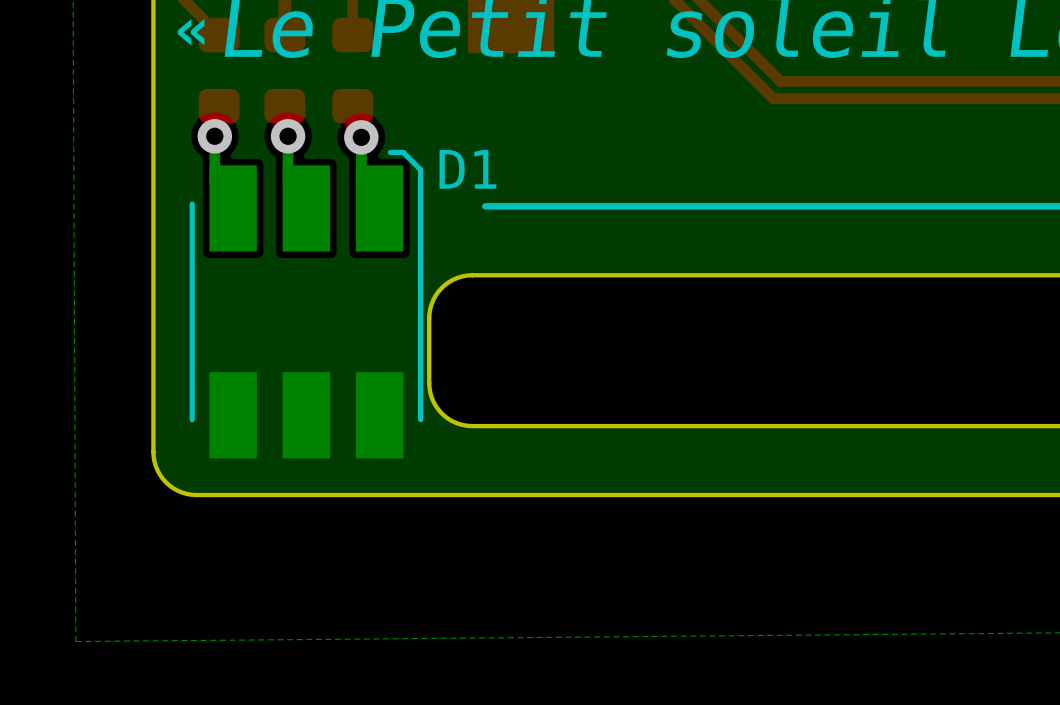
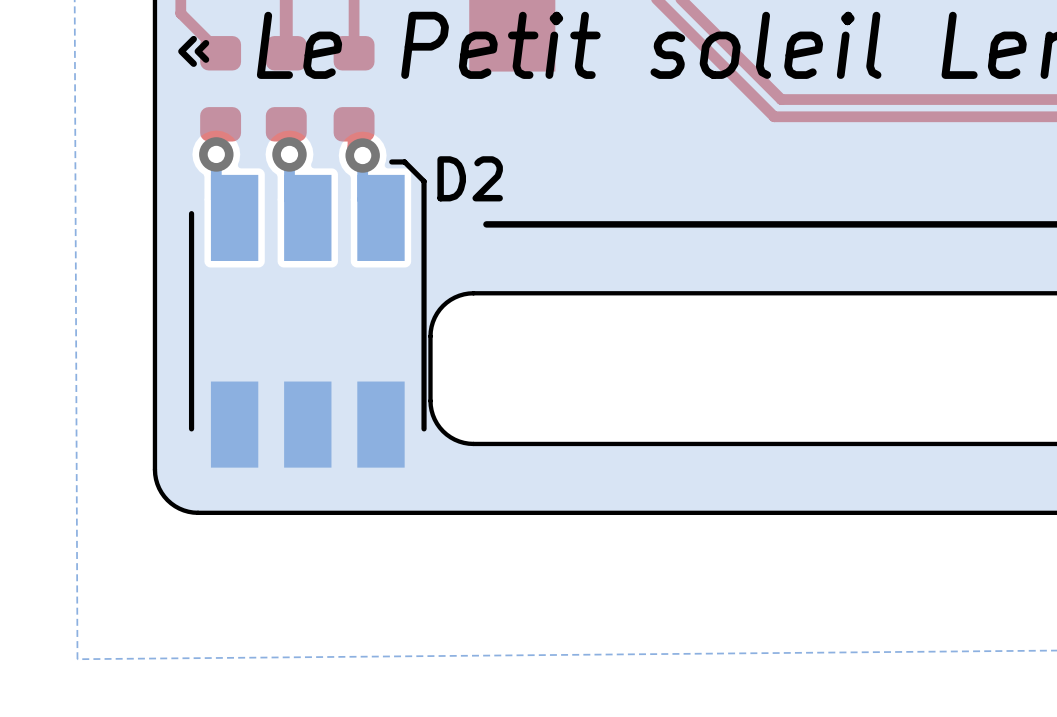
D2: none -> (307, 313)
D1: (306, 304) -> none

